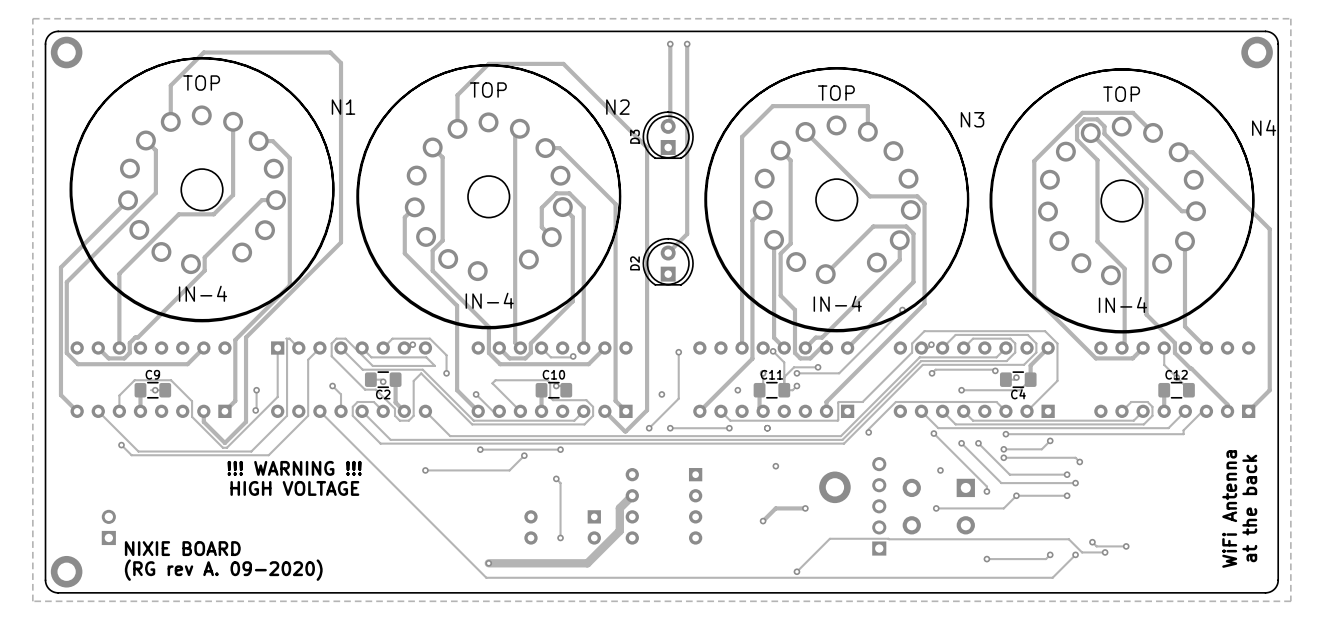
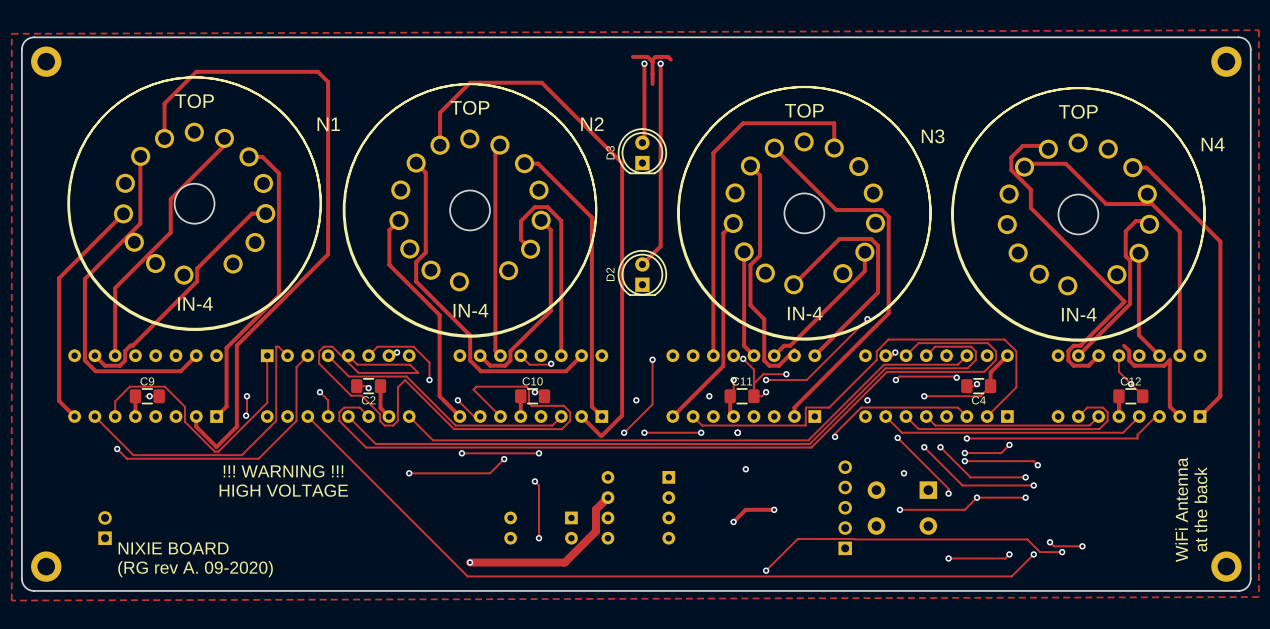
zone outline: (32, 18) (32, 601) (1290, 601) (1290, 18) (32, 18) -> (1258, 30) (11, 33) (11, 600) (1258, 597) (1258, 30)
track: none -> (632, 56) (647, 56) (652, 61)
track: none -> (670, 59) (668, 56) (655, 56) (652, 59) (652, 83)
part position: (66, 52) -> (46, 61)
part position: (1257, 52) -> (1226, 61)
track: (233, 121) (233, 195) (213, 214) (178, 214) (119, 273) (119, 277) -> (224, 145) (170, 199) (170, 232) (115, 288)
track: (1153, 132) (1132, 112) (1082, 112) (1034, 161) (1034, 296) (1095, 358) (1117, 358) -> (1048, 145) (1022, 145) (1011, 157) (1011, 170) (1030, 189) (1030, 208) (1124, 301) (1080, 345) (1073, 345) (1068, 350) (1068, 360) (1073, 365)
track: (1090, 133) (1146, 188) (1146, 314) (1169, 337) -> none
track: (145, 140) (155, 150) (155, 193) (66, 282) (66, 352) (78, 364) (99, 364) -> (140, 163) (140, 223) (84, 279) (84, 360) (95, 371)
track: none -> (1024, 163) (1065, 163) (1106, 204) (1152, 204) (1179, 231) (1179, 355)
track: (1196, 211) (1181, 211) (1104, 133) (1104, 126) (1097, 119) (1084, 119) (1077, 126) (1077, 139) (1097, 160) (1097, 241) (1124, 268) (1124, 345) -> (1149, 221) (1135, 221) (1125, 231) (1125, 256) (1130, 260) (1130, 304) (1080, 353)
track: (1180, 358) (1227, 404) (1227, 411) -> (1134, 365) (1164, 365) (1169, 360) (1169, 406) (1179, 416)
via: none -> (867, 400)
part: (834, 487) -> none
part: none -> (1226, 566)
part position: (66, 571) -> (46, 566)
board edge: (58, 592) (49, 589) (45, 580) (45, 44) (49, 35) (58, 31) (1270, 32) (1276, 37) (1278, 44) (1278, 580) (1274, 589) (1265, 592) -> (56, 590) (29, 590) (23, 584) (21, 578) (21, 49) (25, 40) (34, 37) (1243, 38) (1249, 43) (1250, 49) (1250, 578) (1249, 584) (1243, 590) (1216, 590)

